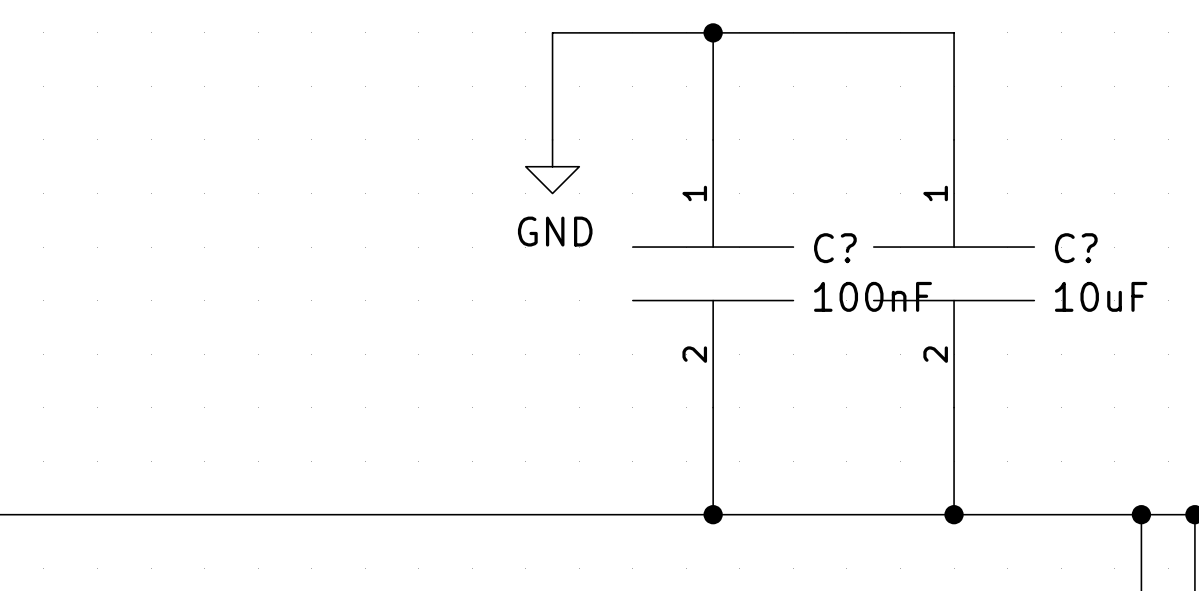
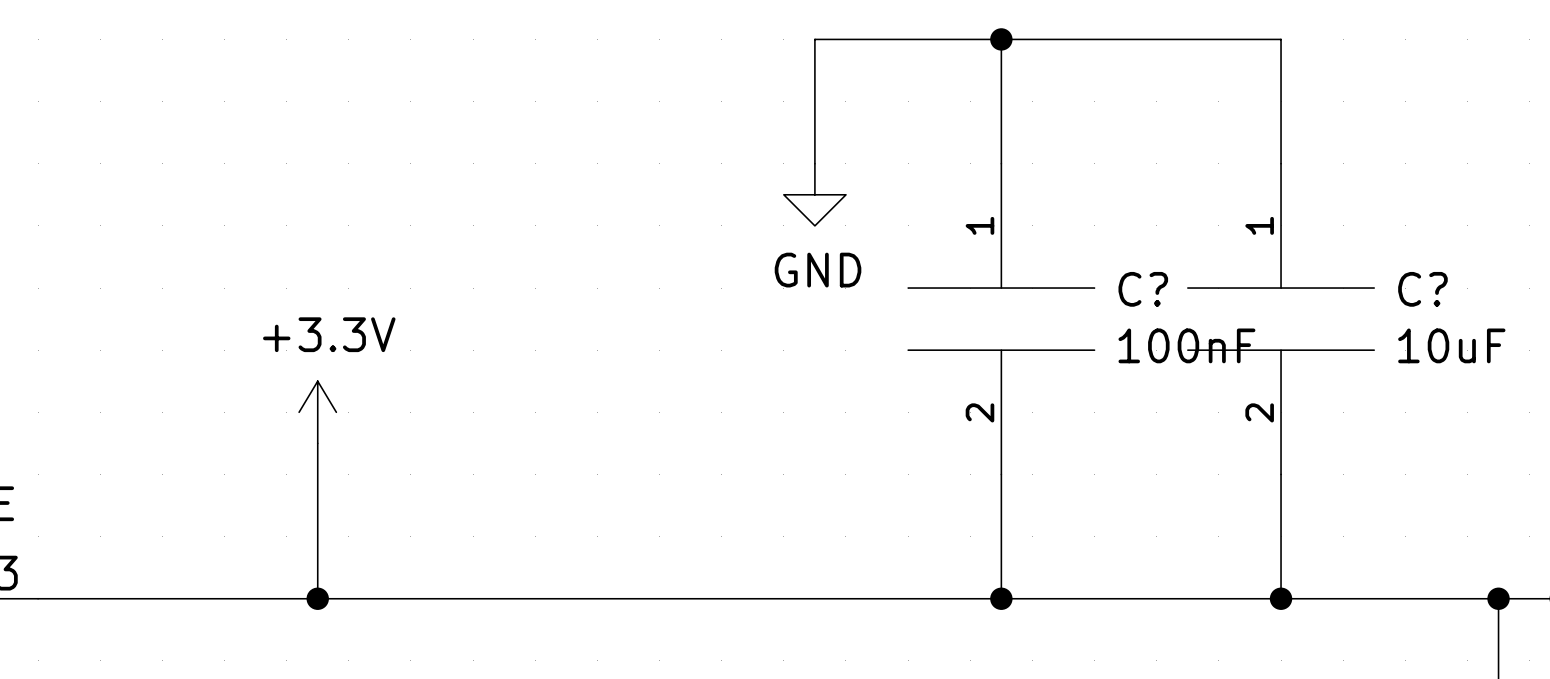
power symbol: none -> +3.3V (317, 412)
wire: none -> (317, 443) (317, 598)
junction: none -> (317, 598)

